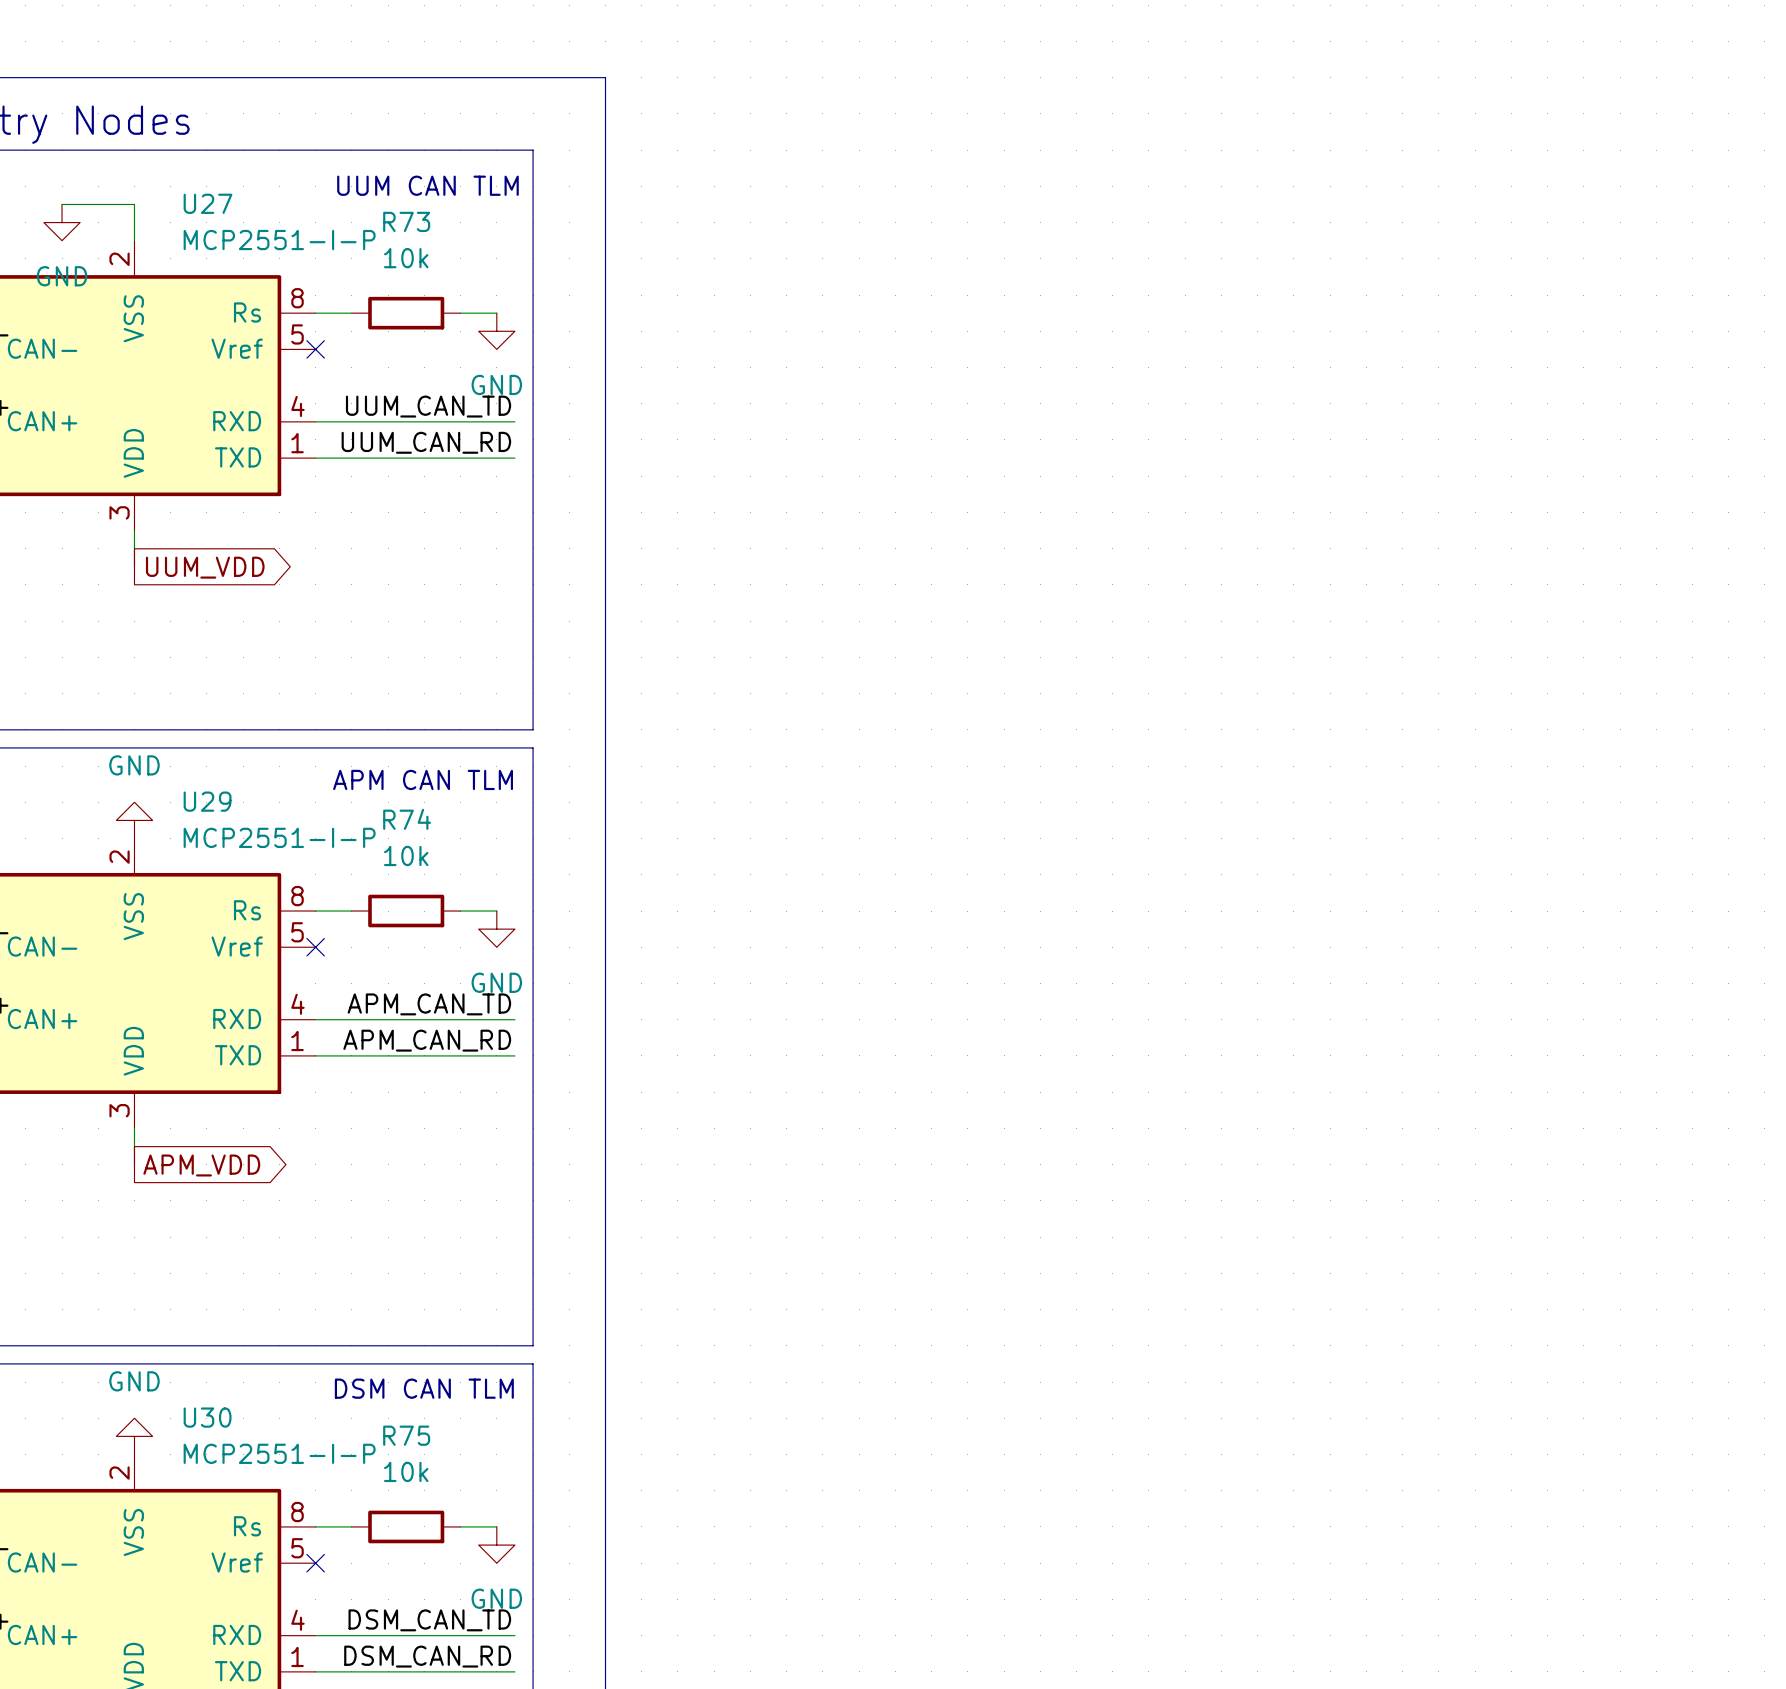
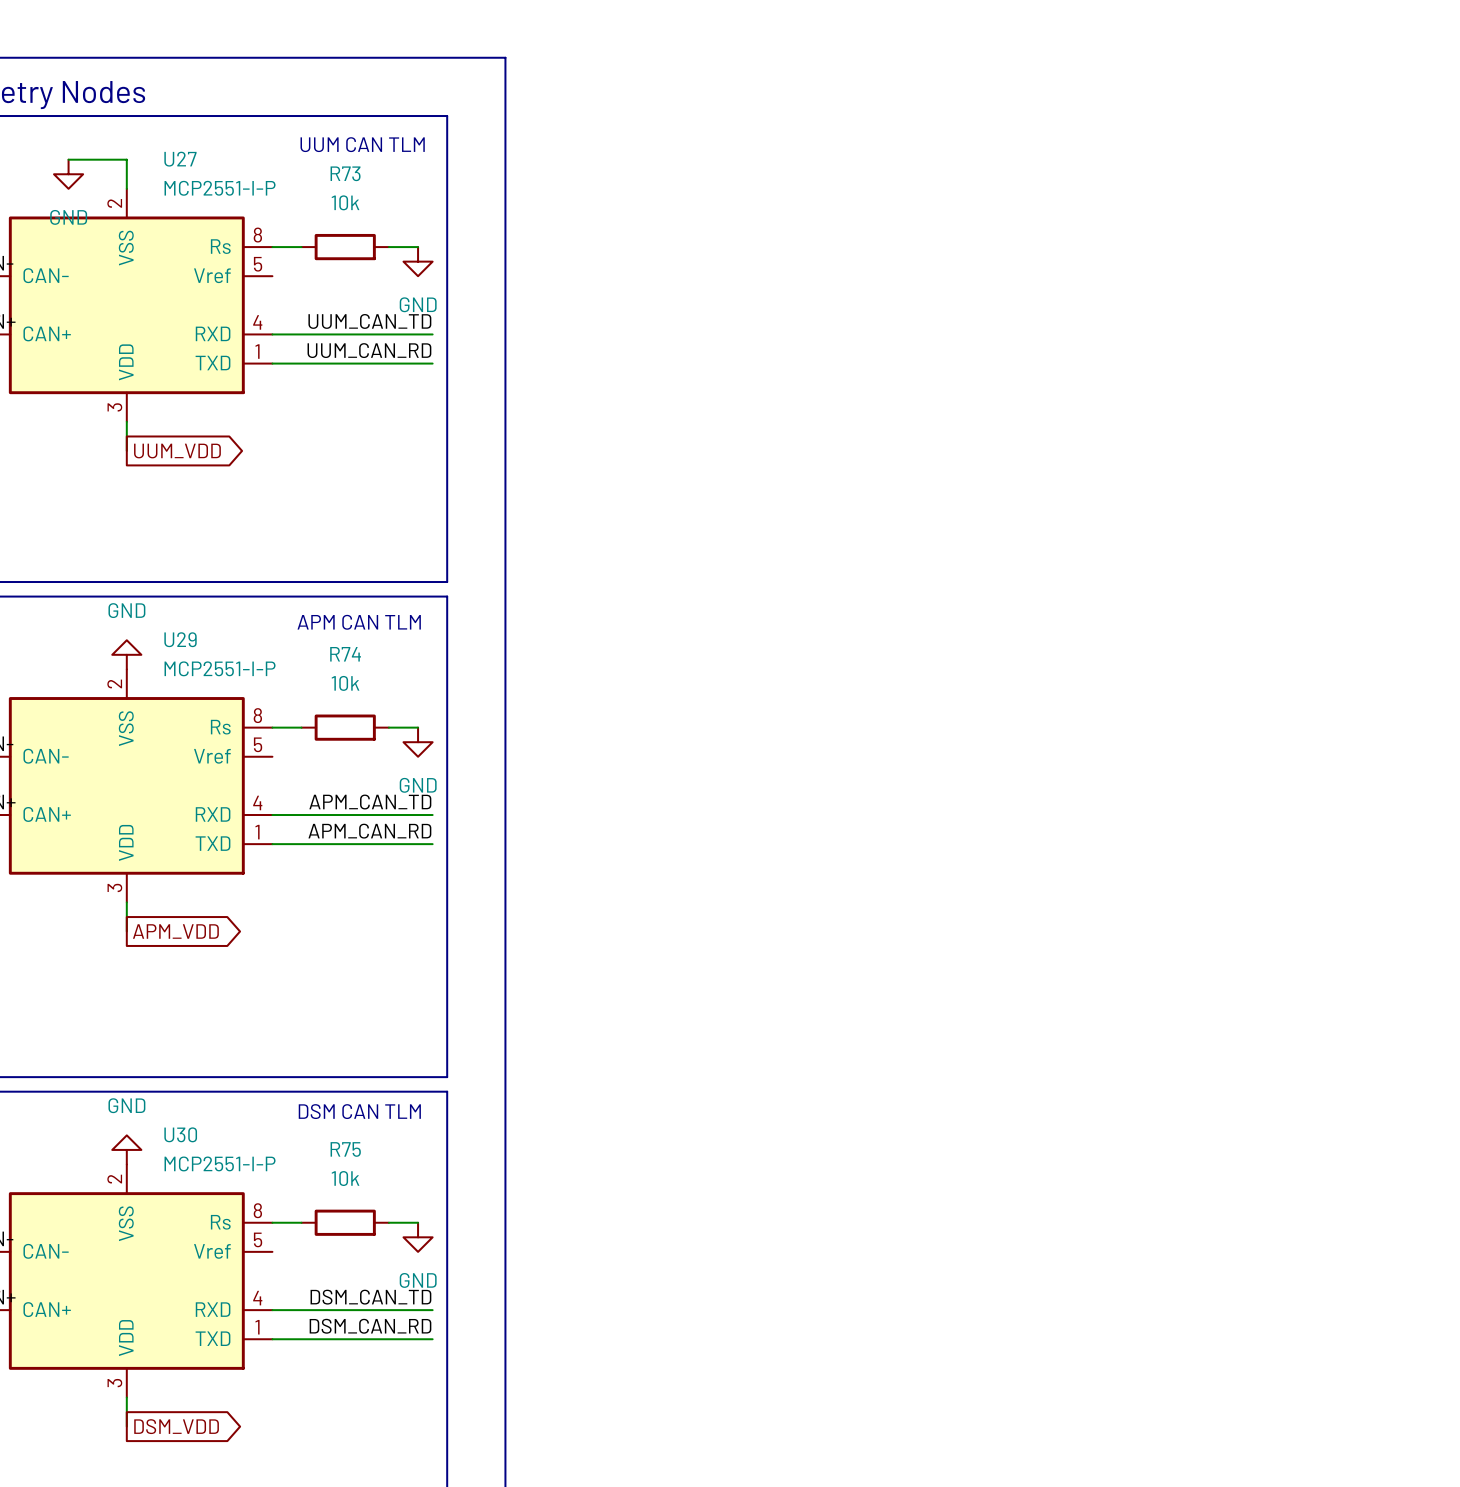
no-connect mark: (315, 349) -> none
no-connect mark: (315, 947) -> none
no-connect mark: (315, 1563) -> none

